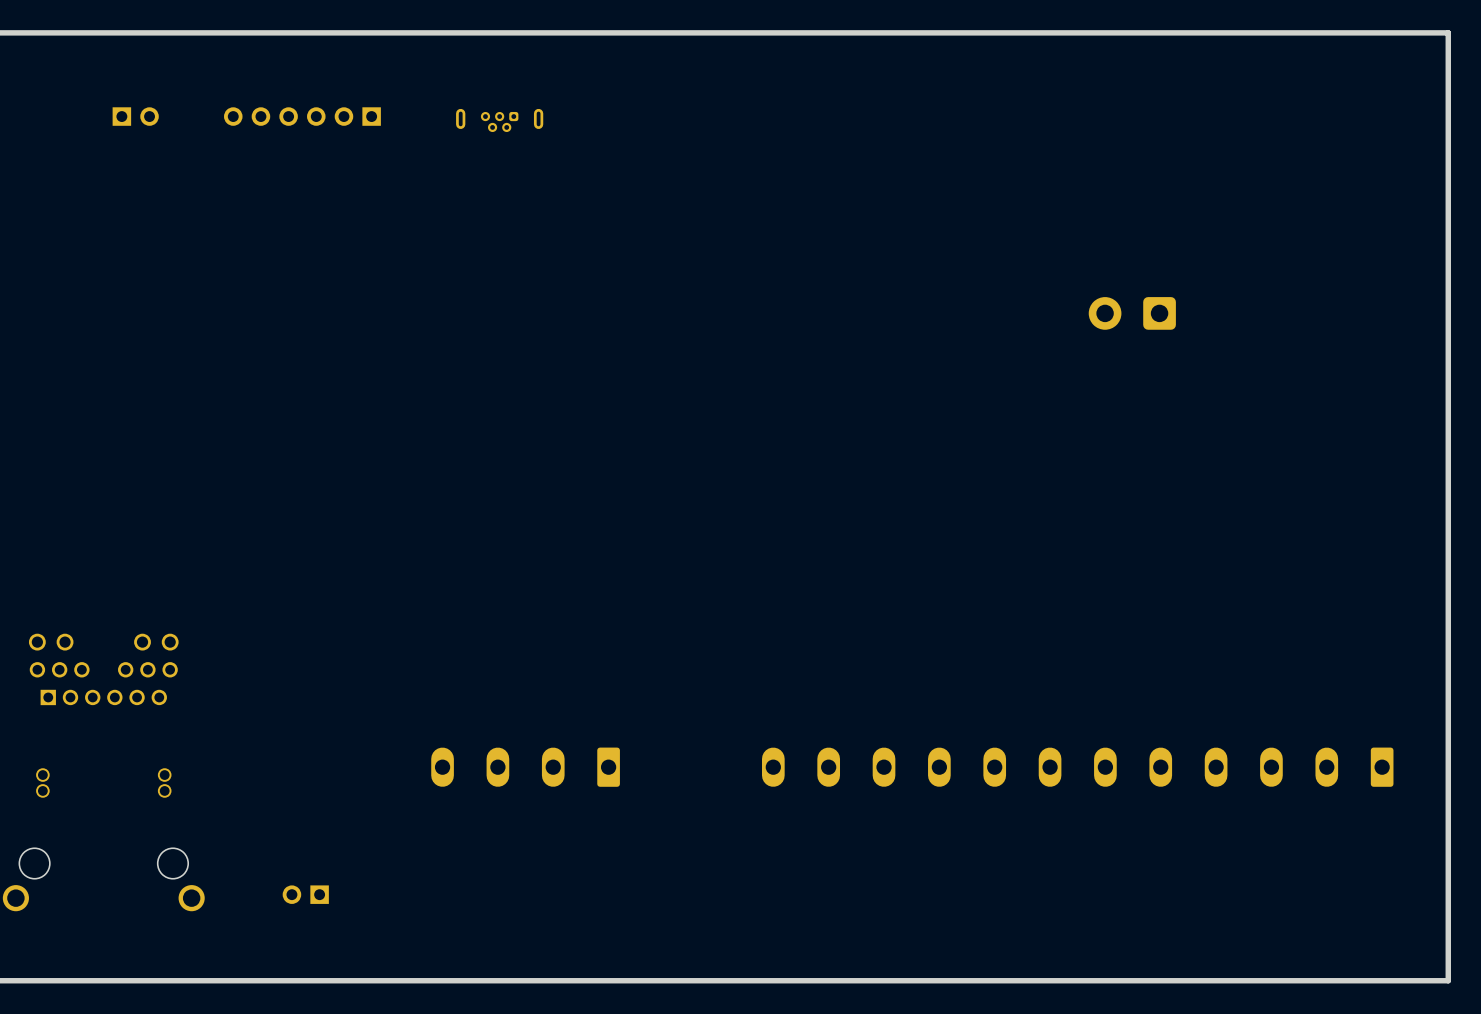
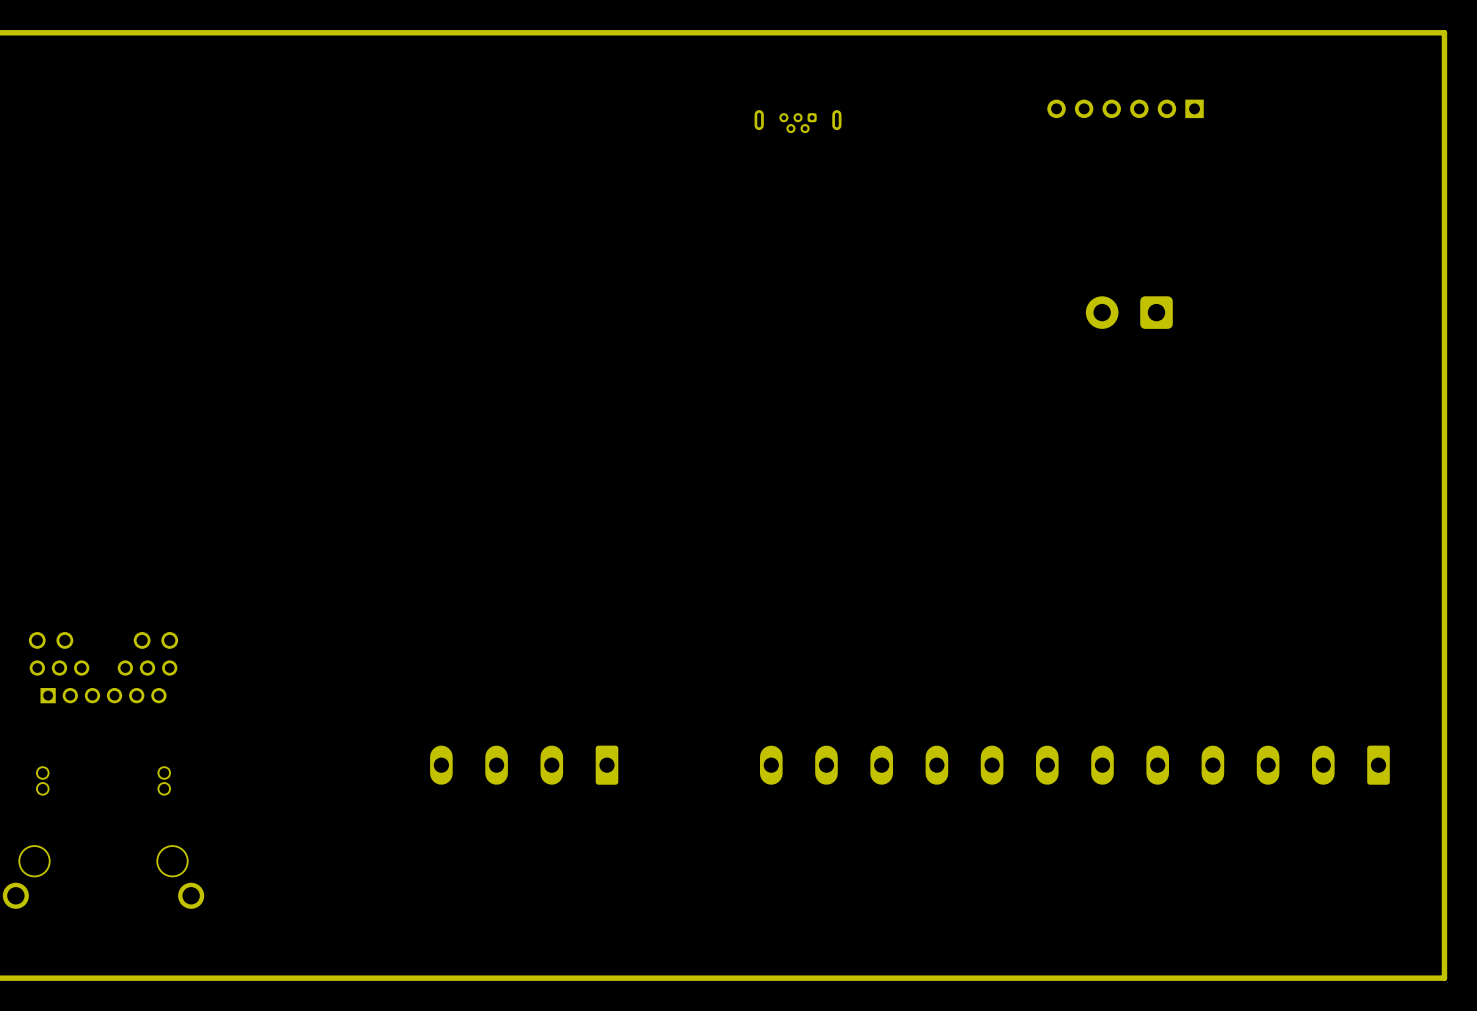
part: none -> (1125, 108)
part: (135, 116) -> none
part: (302, 116) -> none
part: (499, 120) -> none
part: none -> (798, 121)
part: (305, 894) -> none

